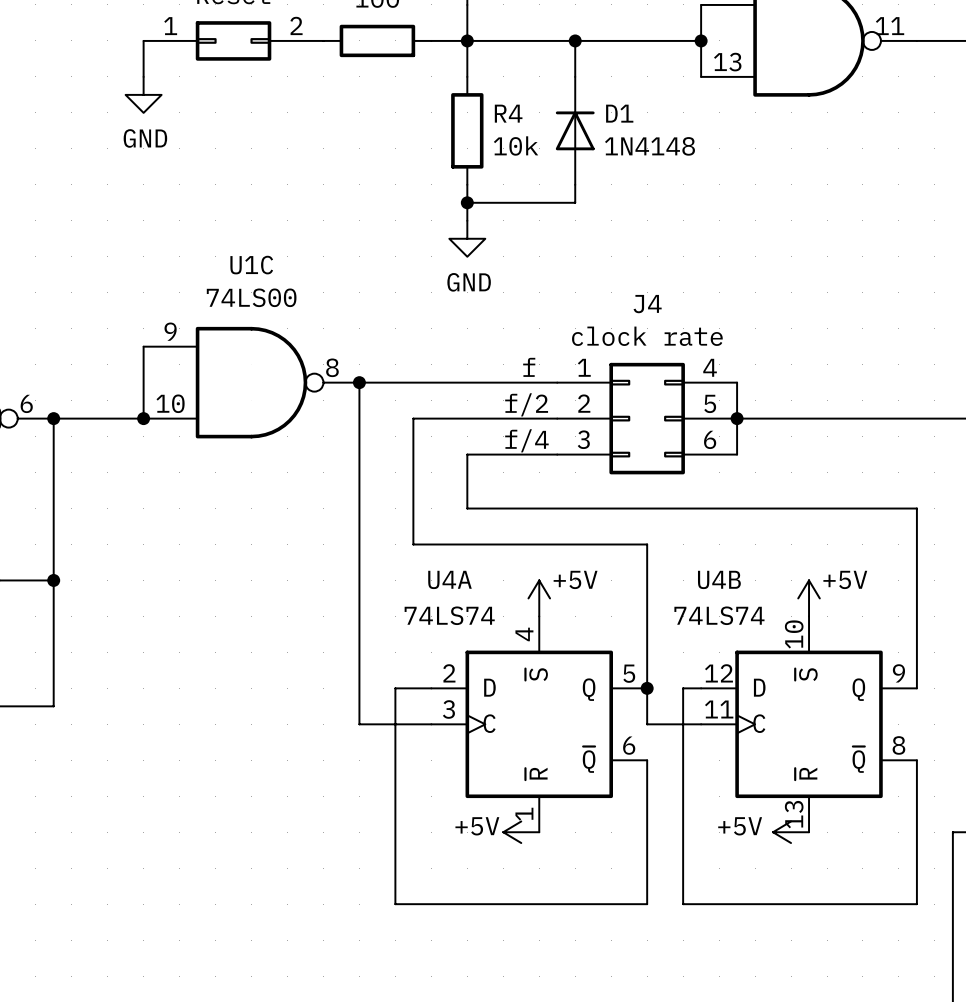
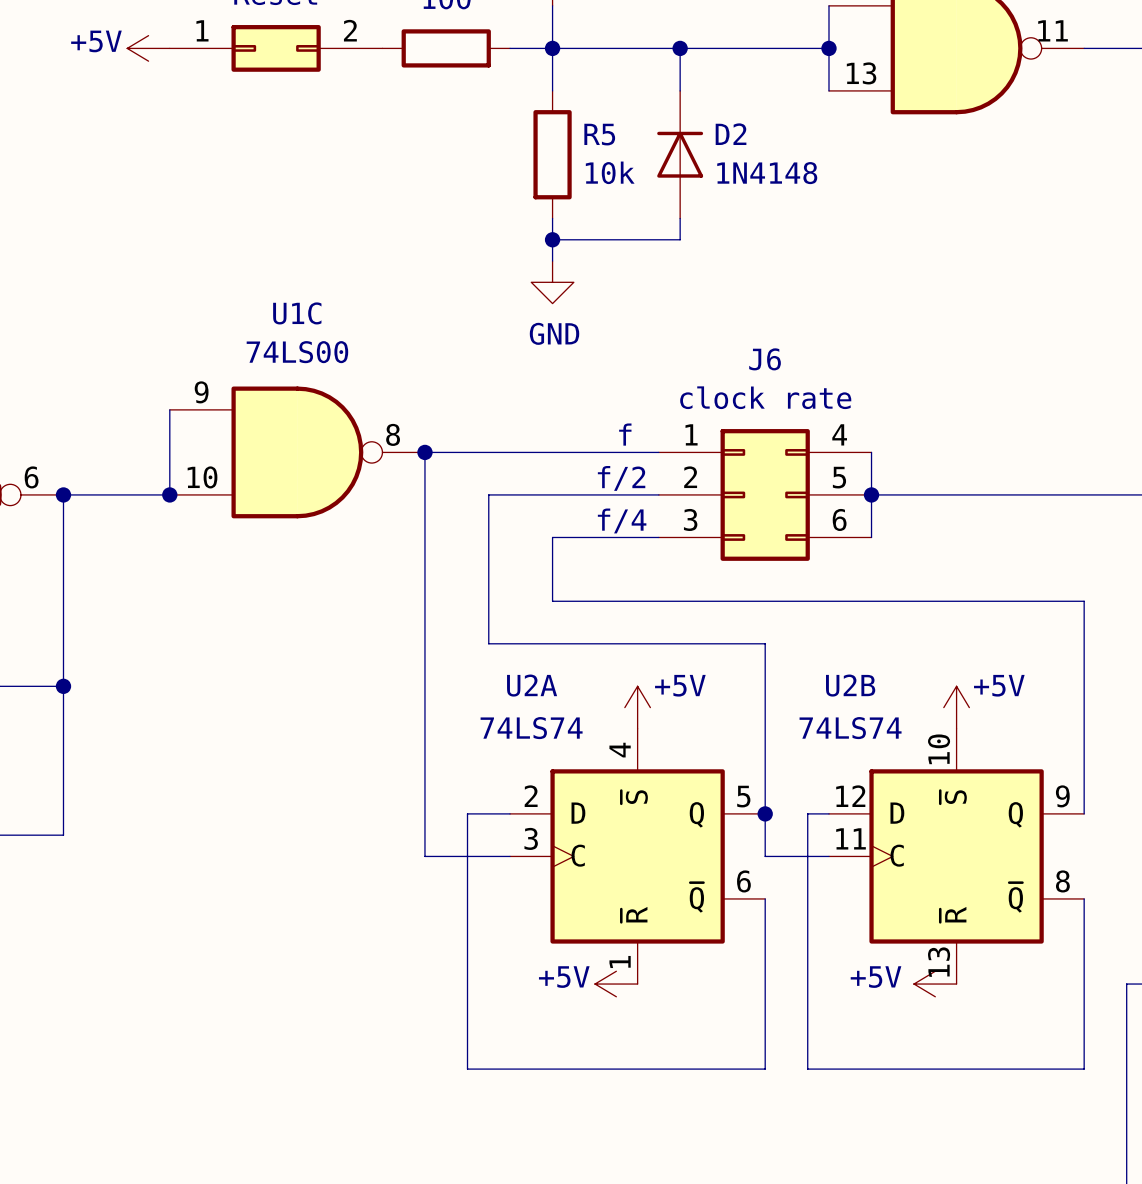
power symbol: none -> +5V (148, 48)
wire: (143, 40) (143, 76) -> none
power symbol: GND (143, 94) -> none
R4 name: R4 (508, 113) -> R5 (599, 134)
D1 name: D1 (619, 113) -> D2 (731, 134)
J4 name: J4 (647, 304) -> J6 (765, 359)
U4A name: U4A (449, 579) -> U2A (532, 685)
U4B name: U4B (719, 579) -> U2B (850, 685)

